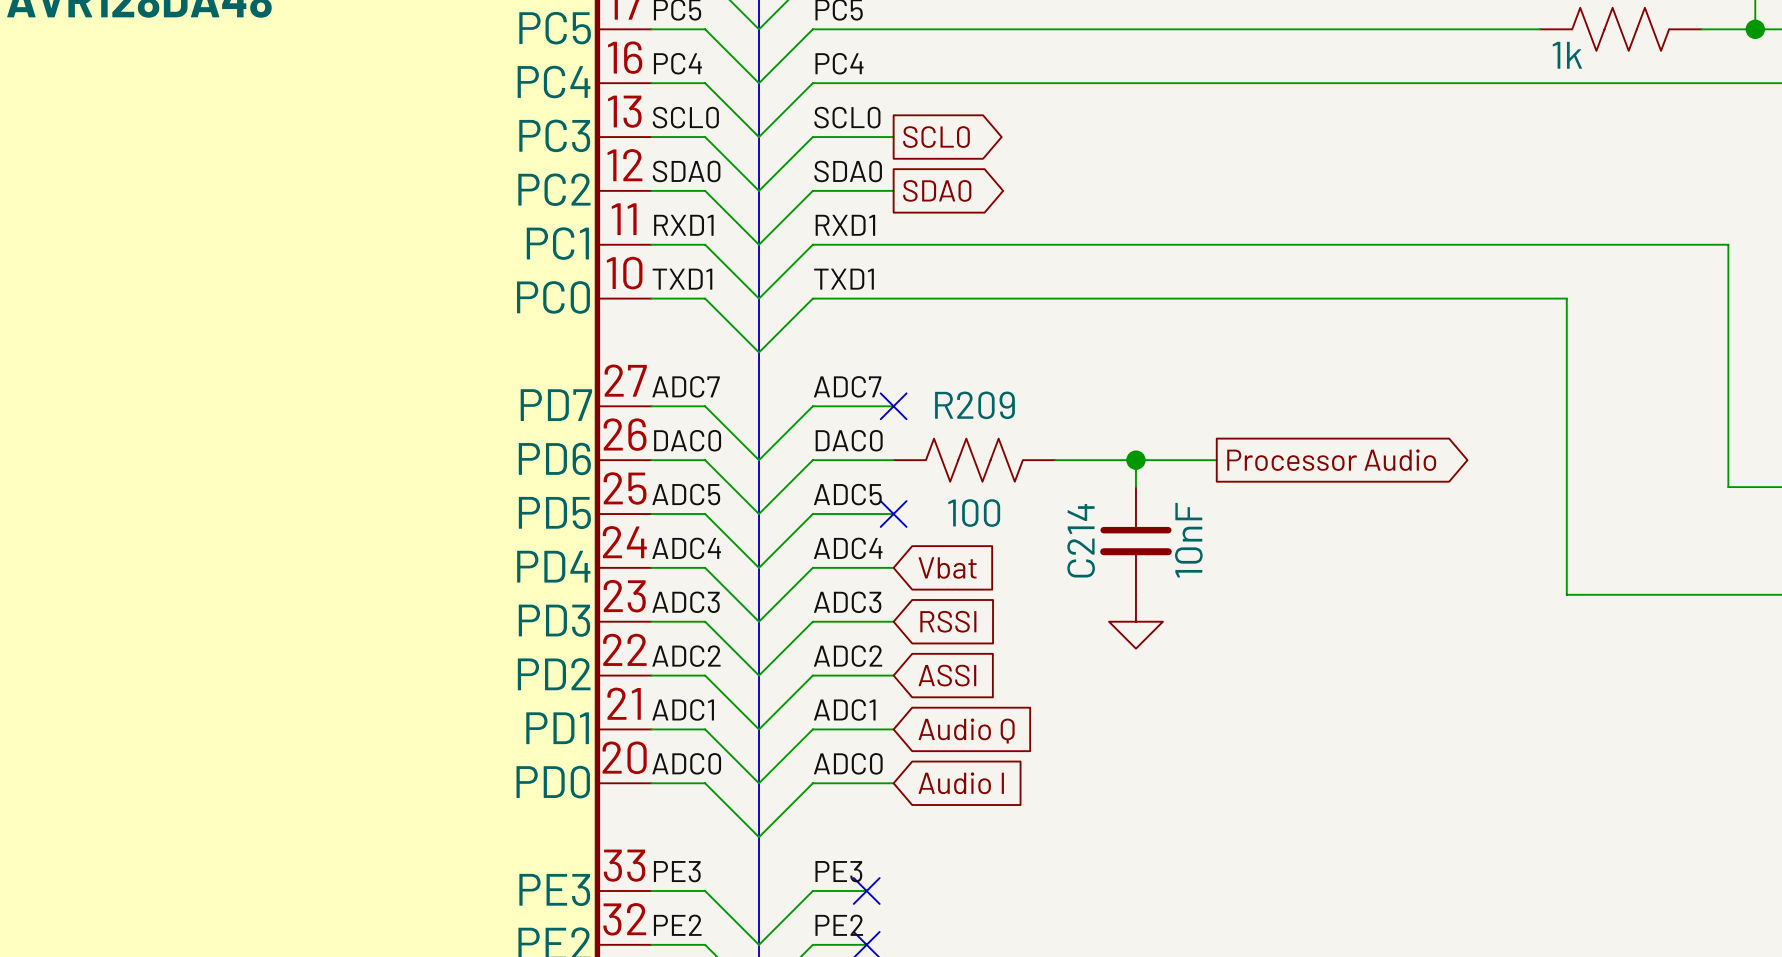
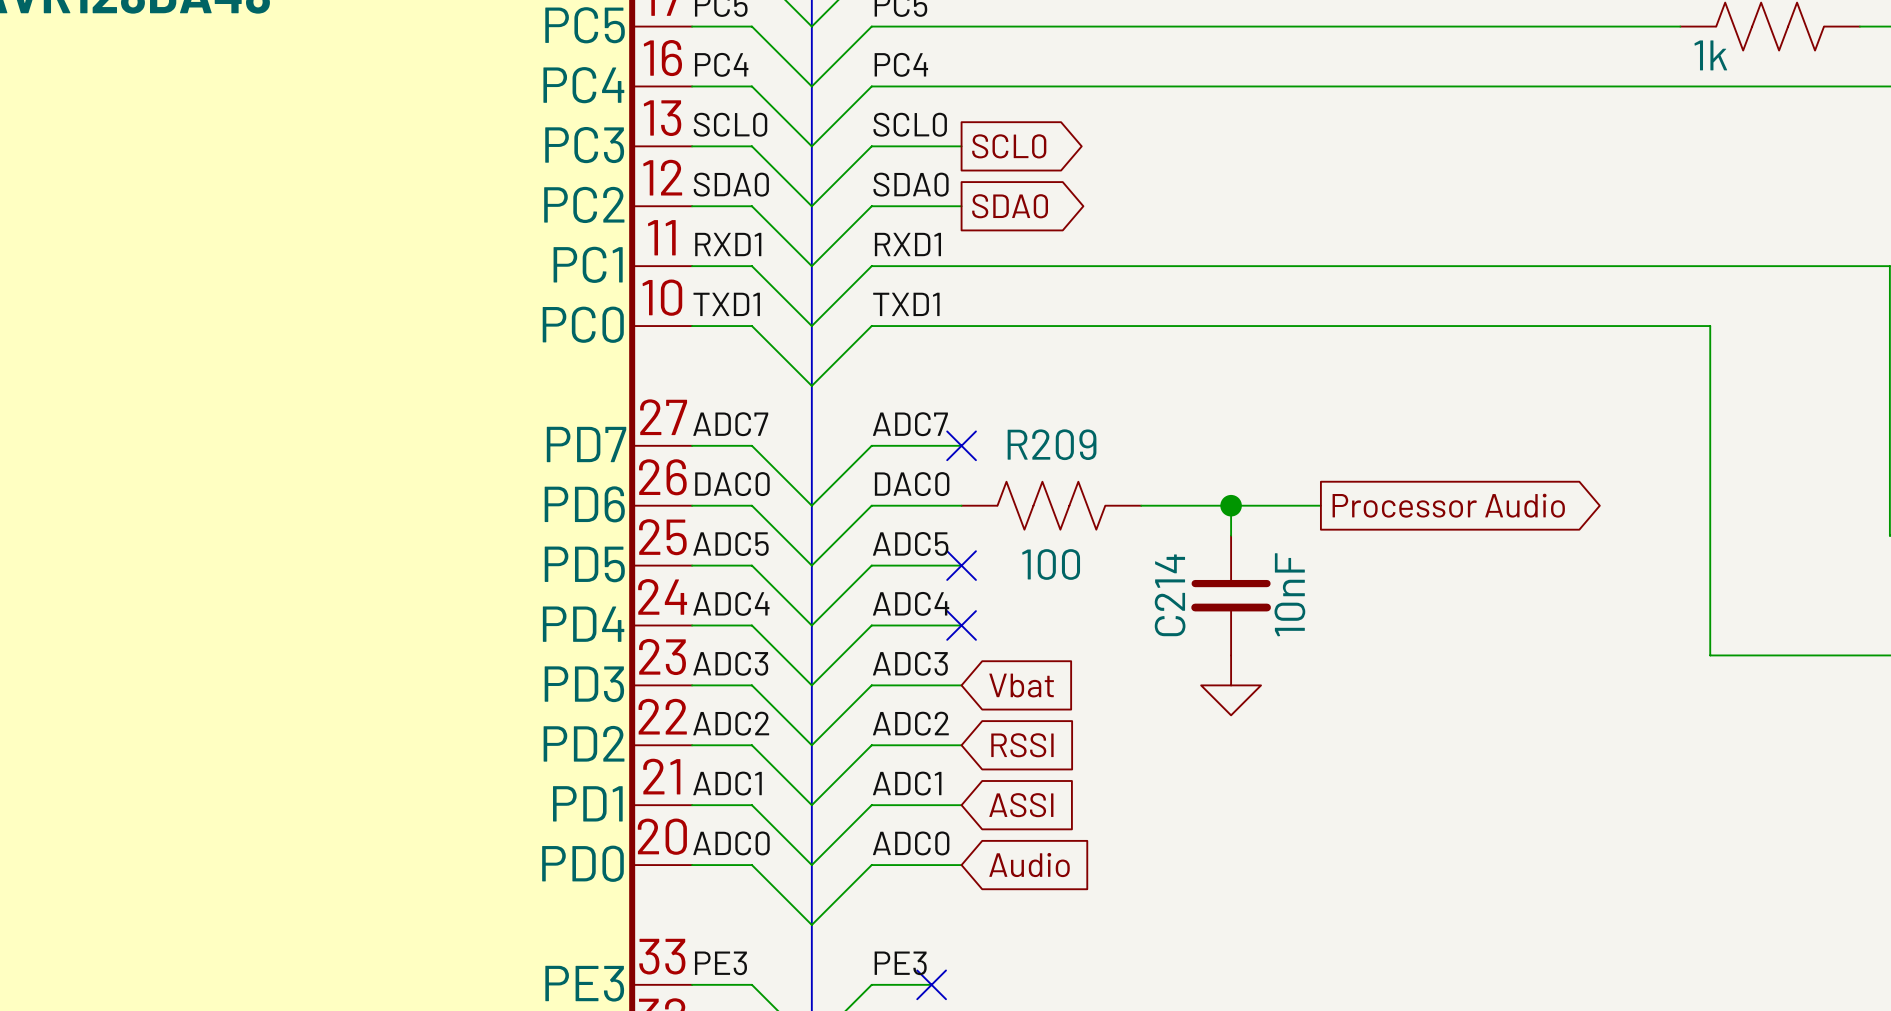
no-connect mark: none -> (961, 625)
global label: Vbat (947, 567) -> none
global label: RSSI (948, 621) -> Vbat (1021, 685)
global label: ASSI (947, 675) -> RSSI (1022, 745)
global label: Audio Q (966, 731) -> ASSI (1021, 805)
global label: Audio I (961, 783) -> Audio (1029, 865)

